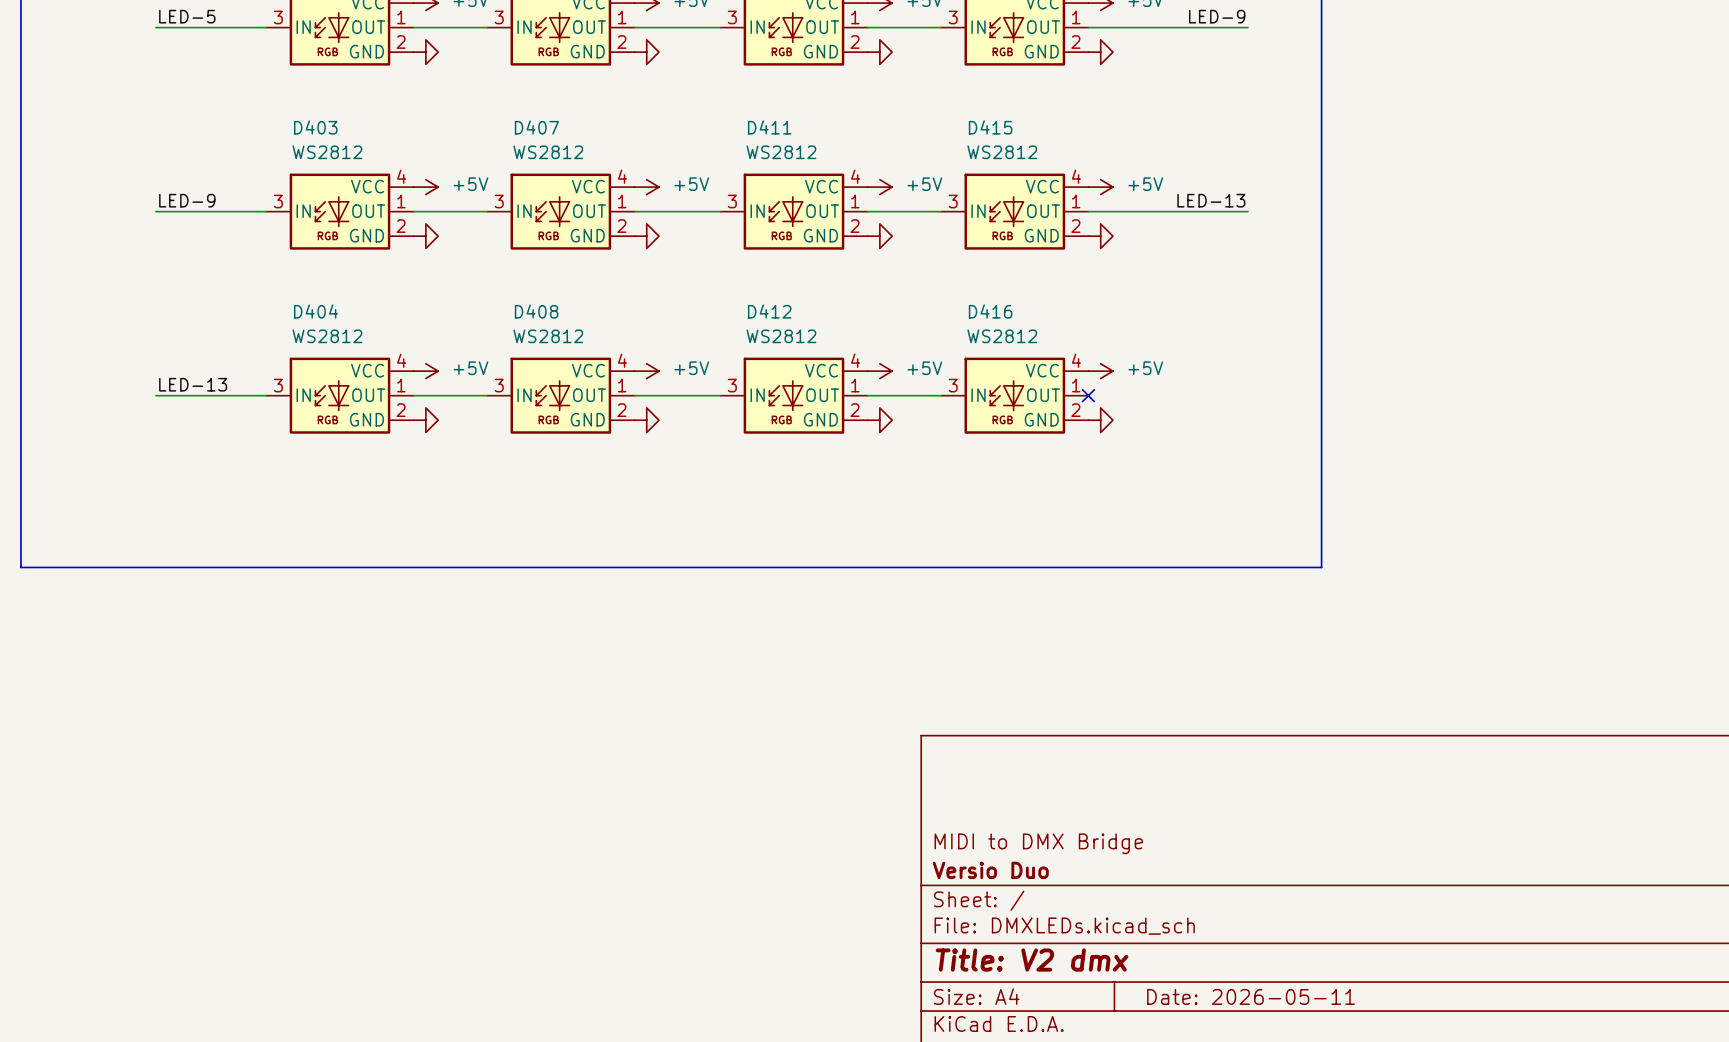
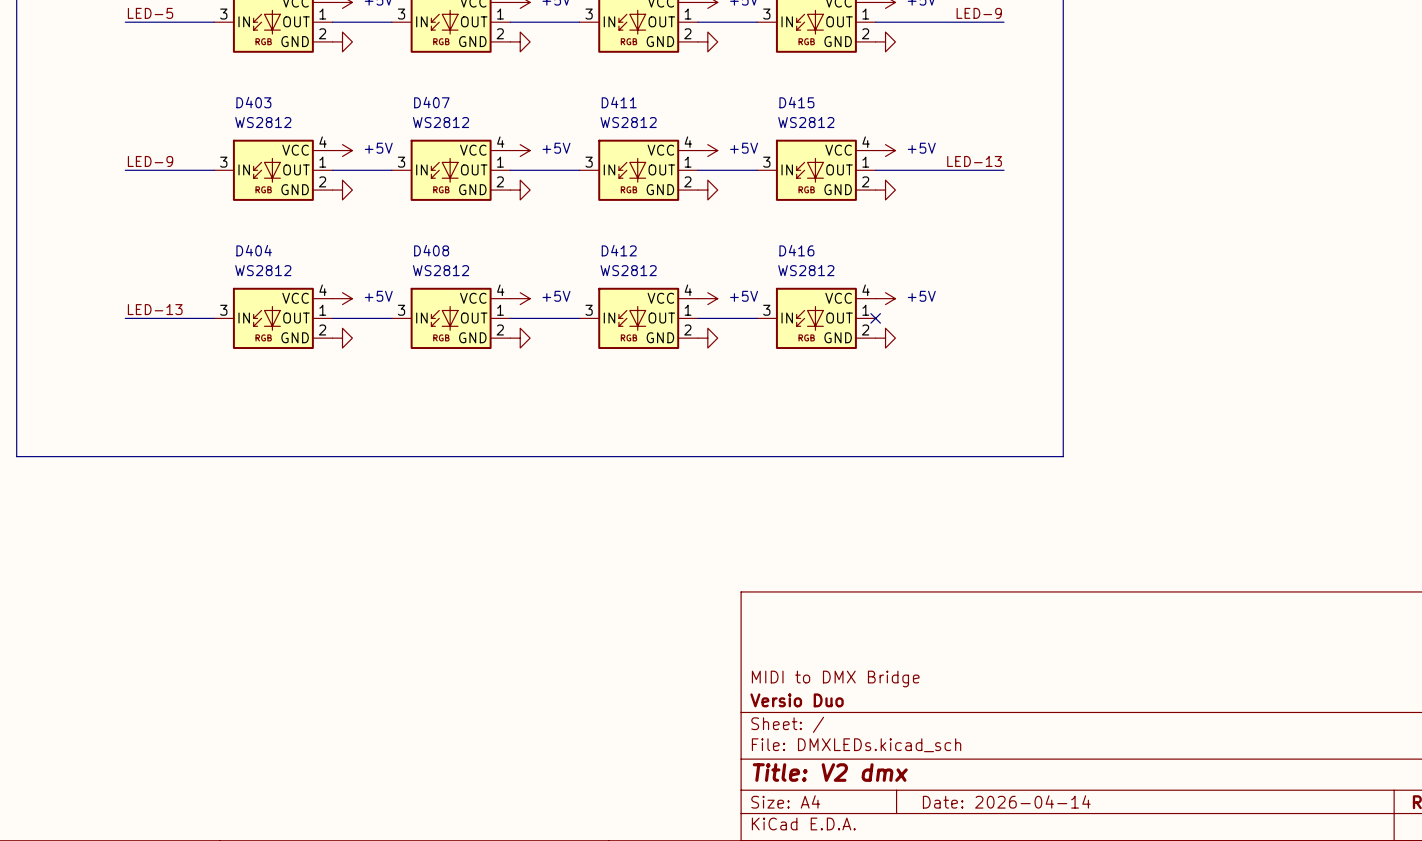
title block: Date: 2026-05-11 (1251, 996) -> Date: 2026-04-14 (1006, 801)

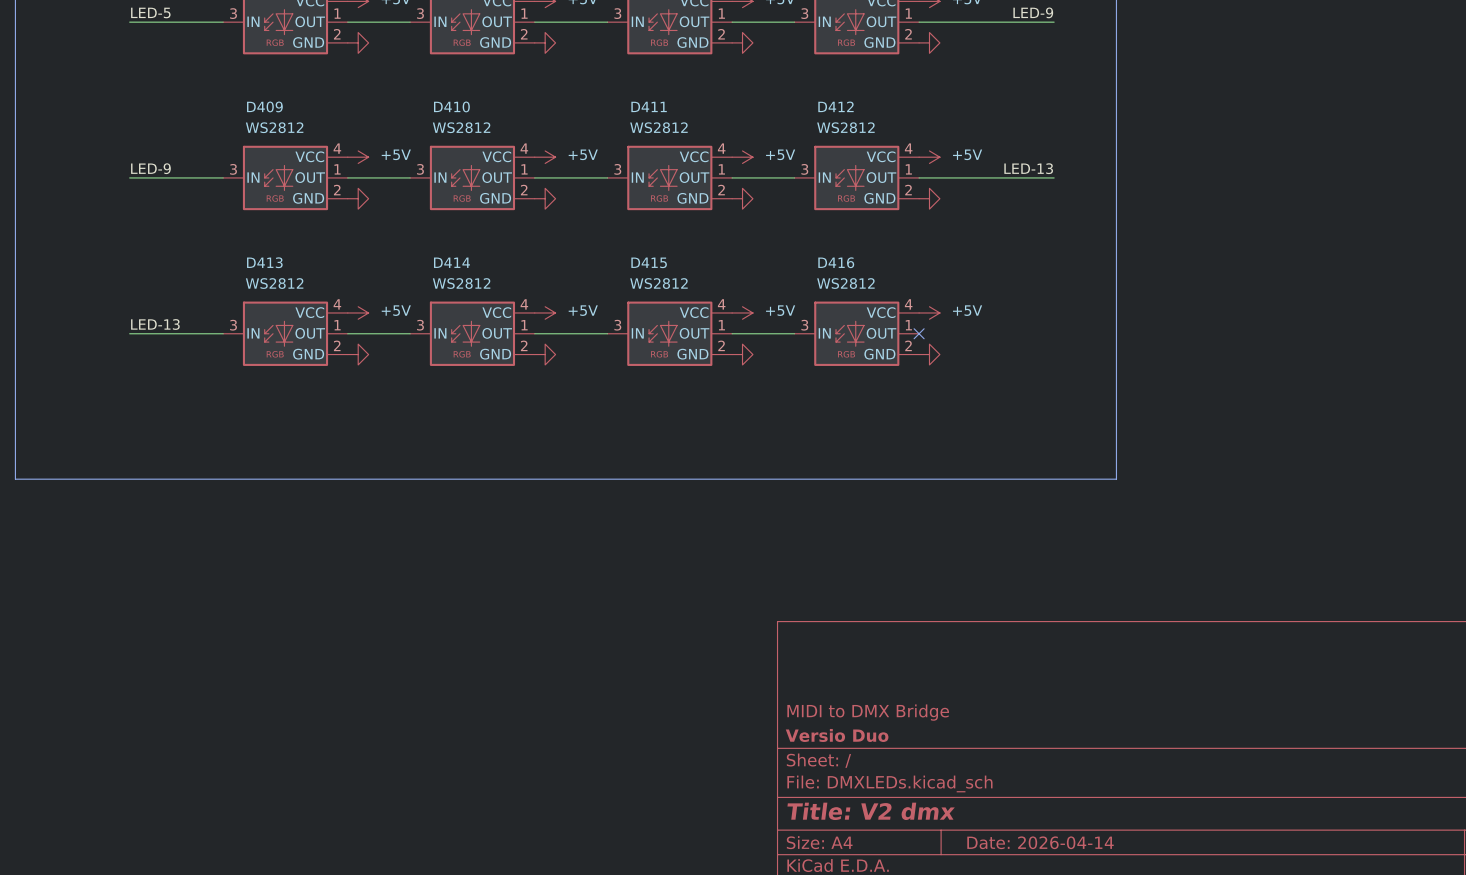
D403 name: D403 (253, 102) -> D409 (264, 106)
D407 name: D407 (431, 102) -> D410 (451, 106)
D415 name: D415 (796, 102) -> D412 (835, 106)
D404 name: D404 (254, 250) -> D413 (264, 262)
D408 name: D408 (431, 250) -> D414 (451, 262)
D412 name: D412 (619, 250) -> D415 (649, 262)

